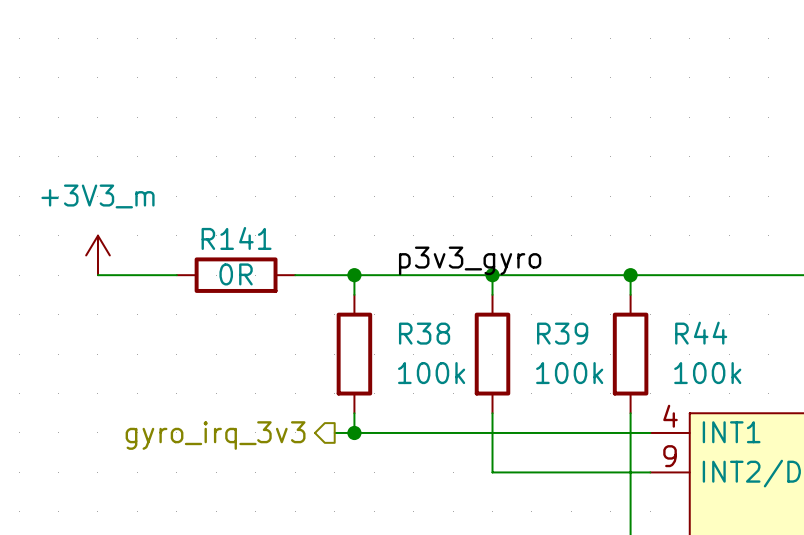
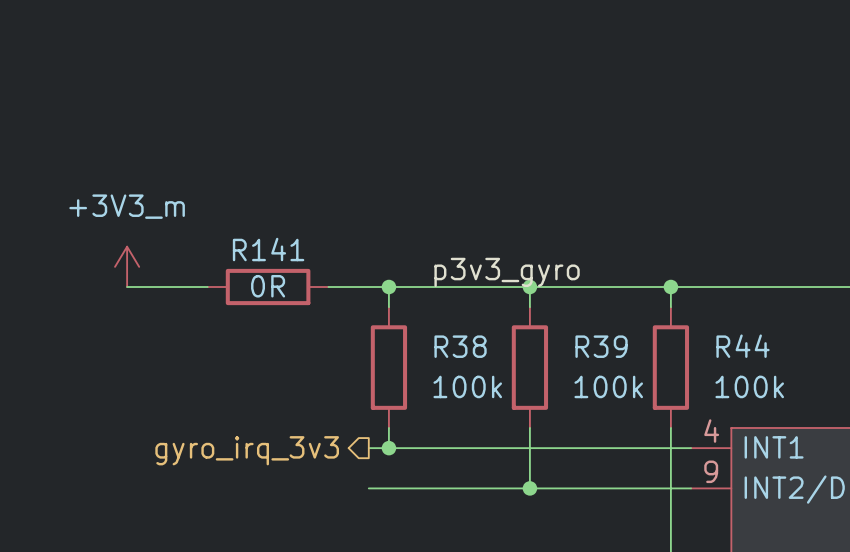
wire: none -> (368, 488) (529, 488)
junction: none -> (529, 488)

